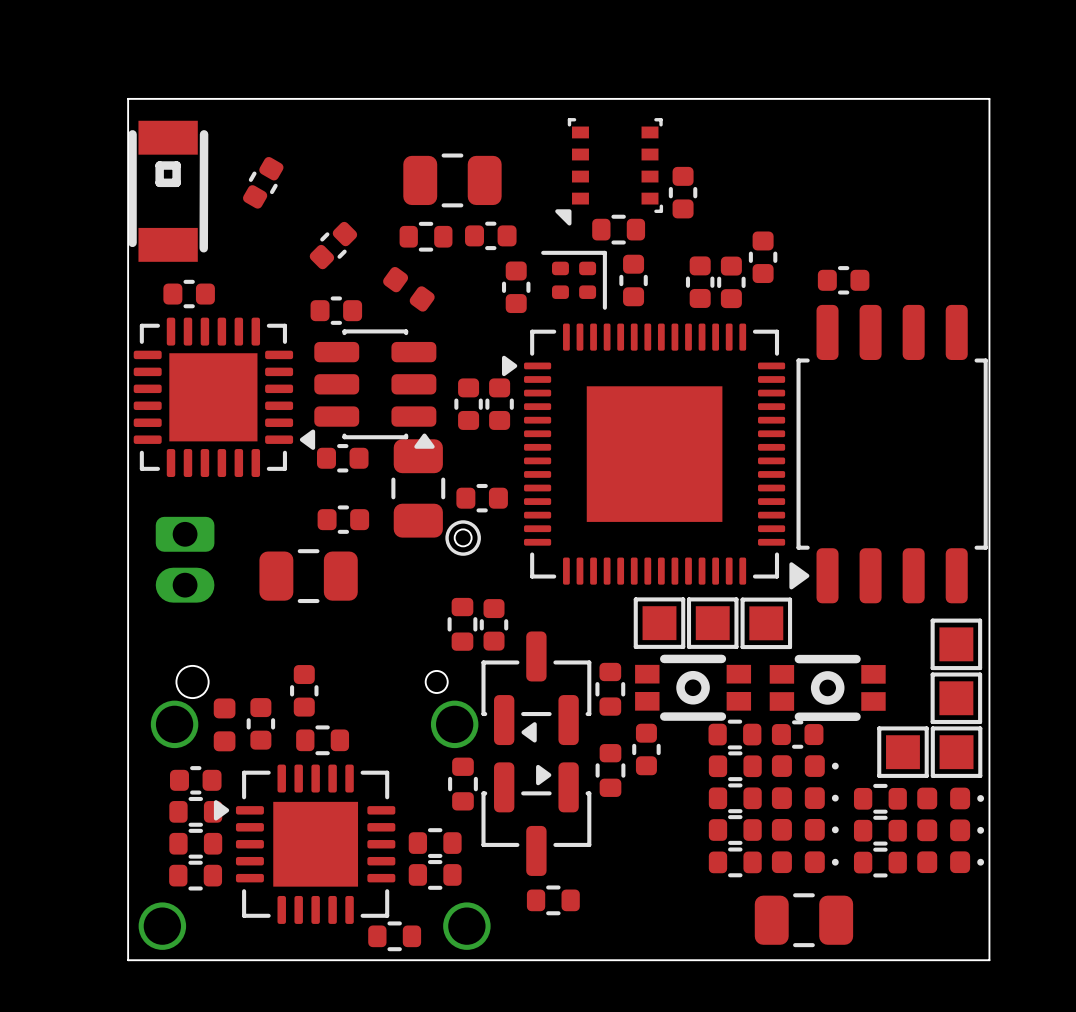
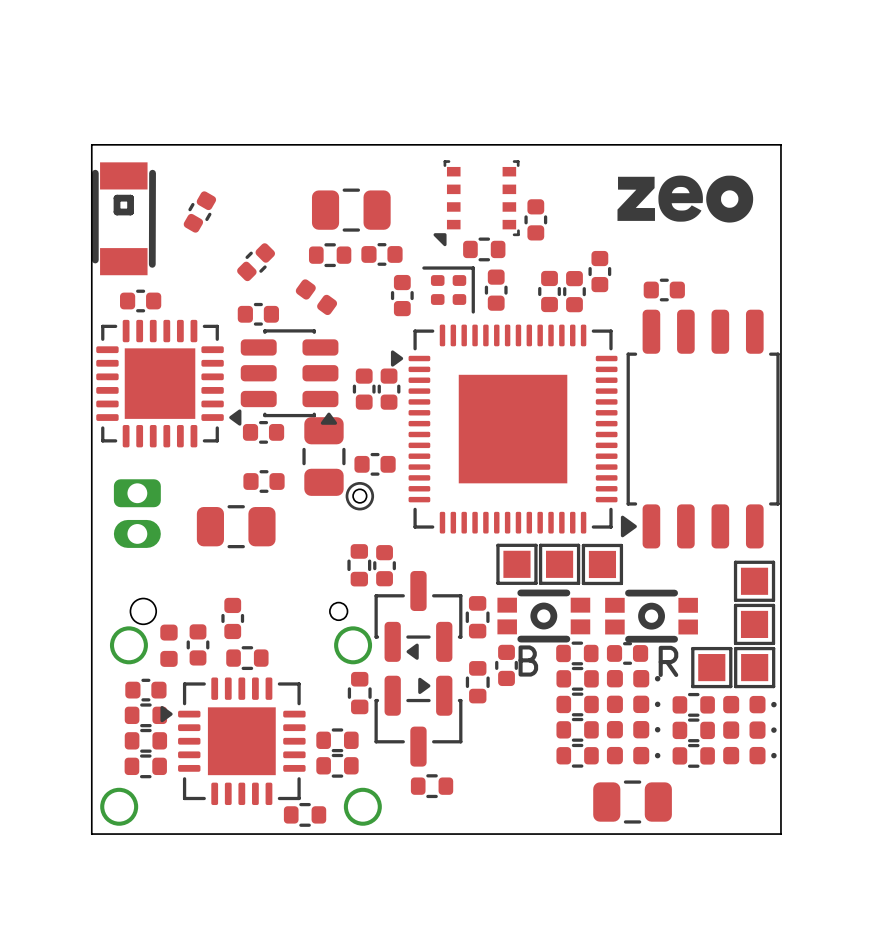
drawing: none -> [617, 175, 754, 223]
B name: none -> B (528, 661)
R name: none -> R (668, 661)

